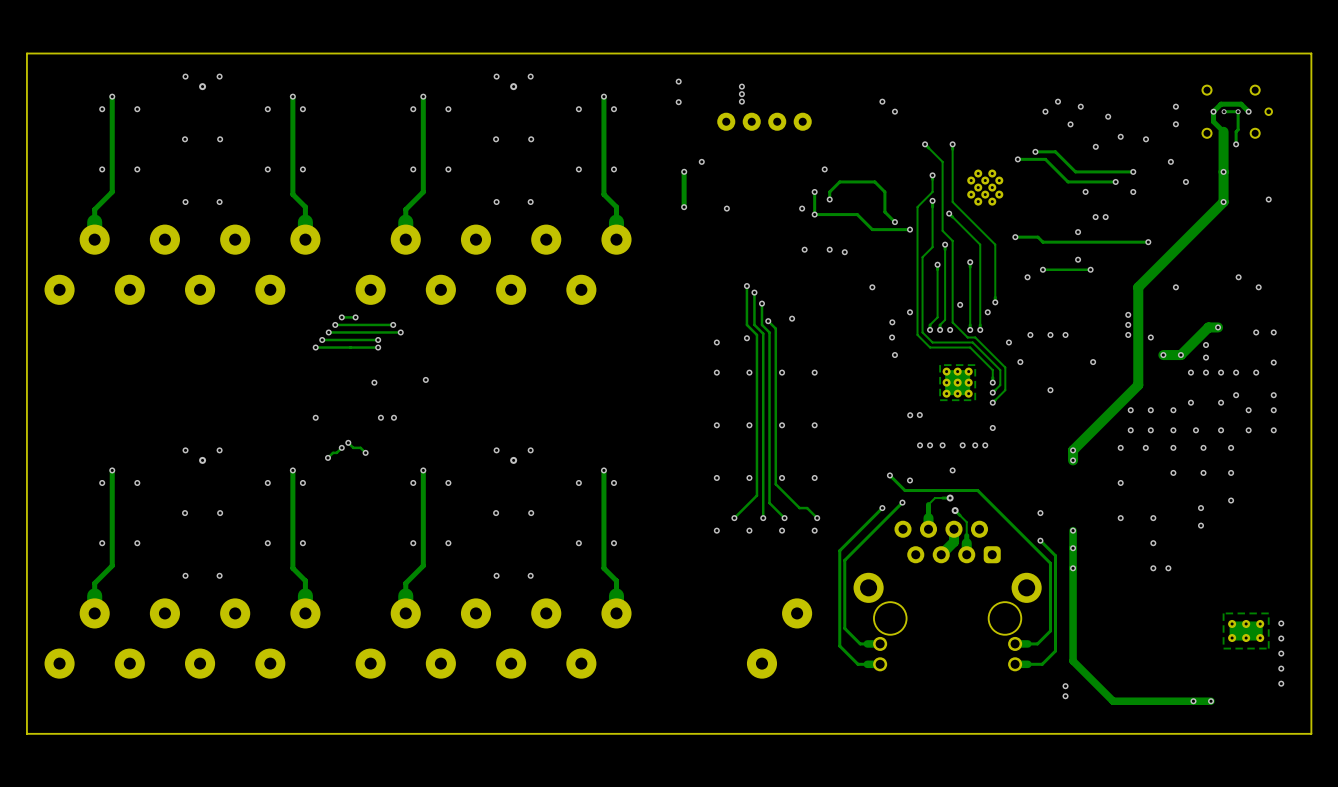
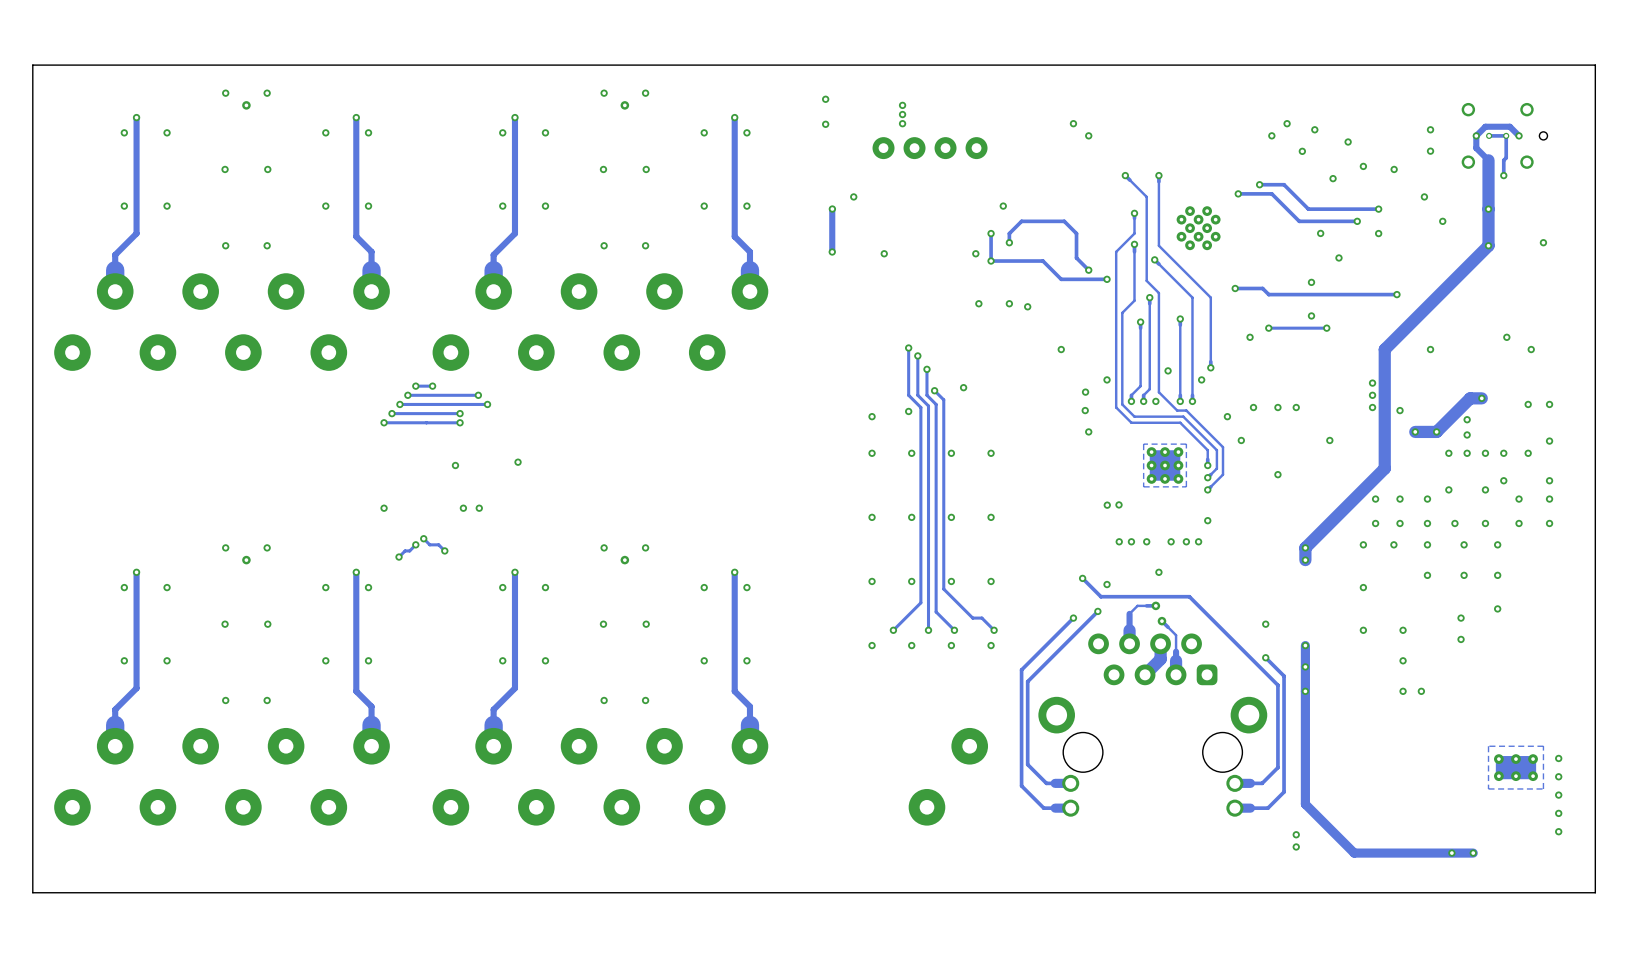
via: none -> (1338, 257)
via: (1095, 217) -> none
via: (1105, 217) -> none

